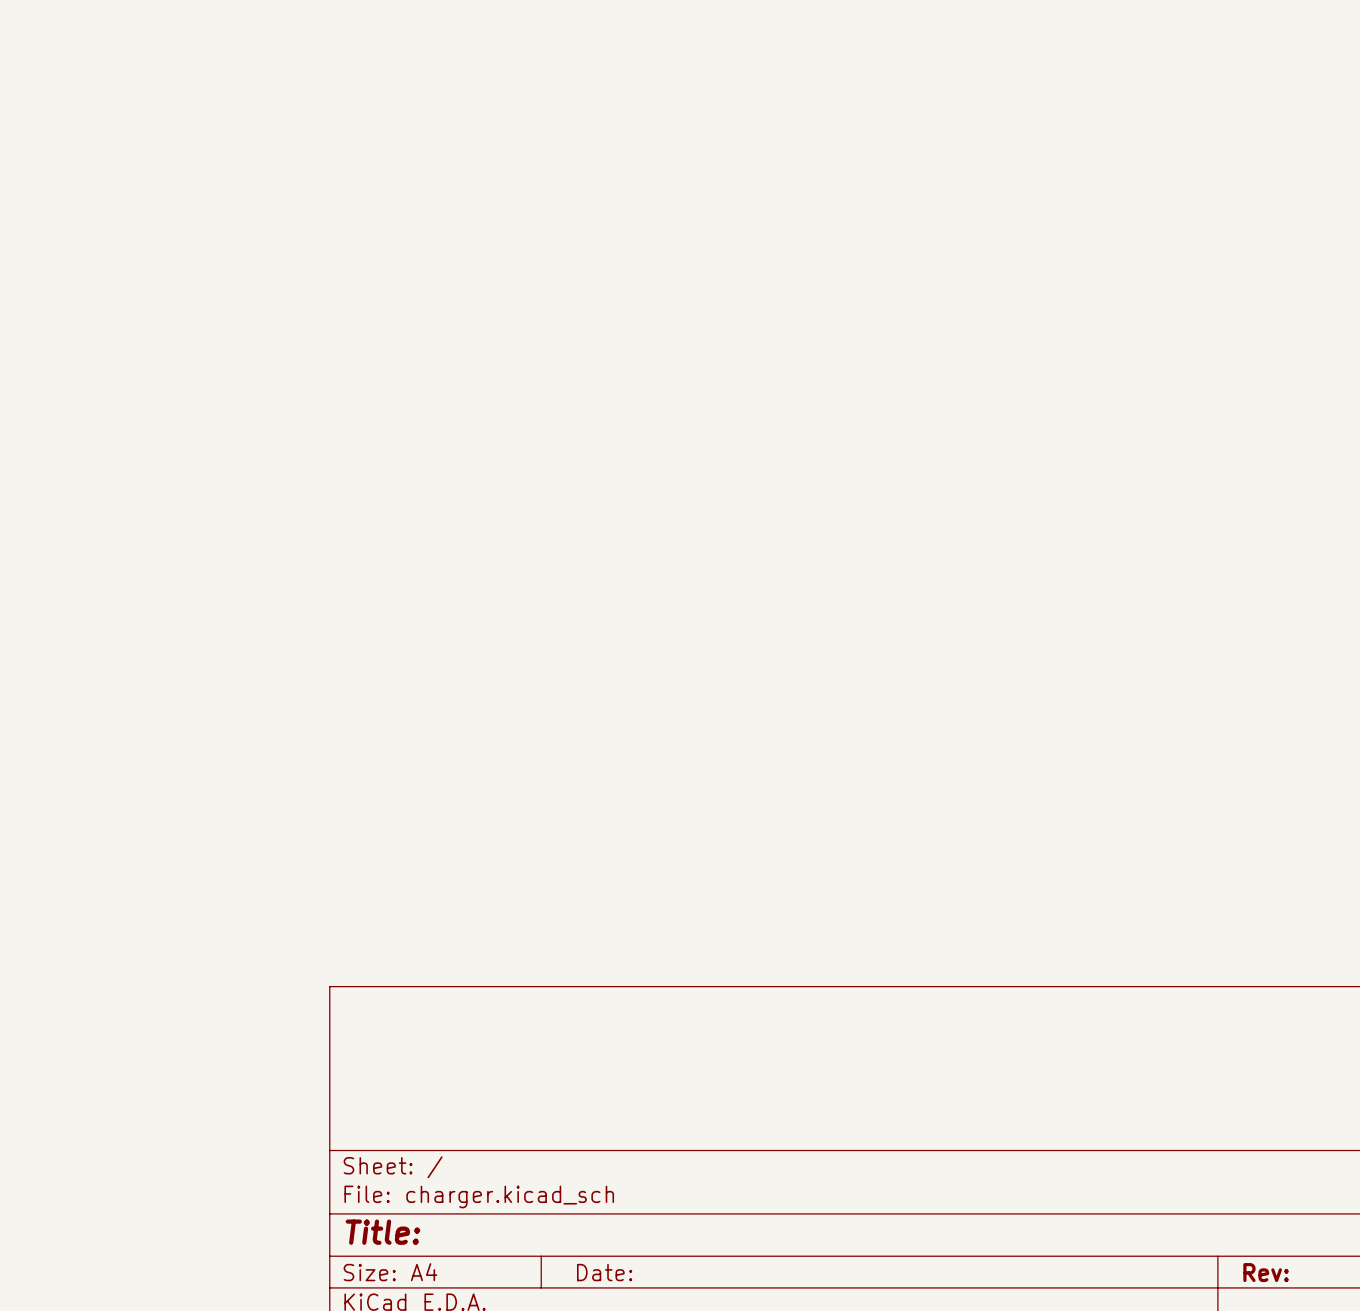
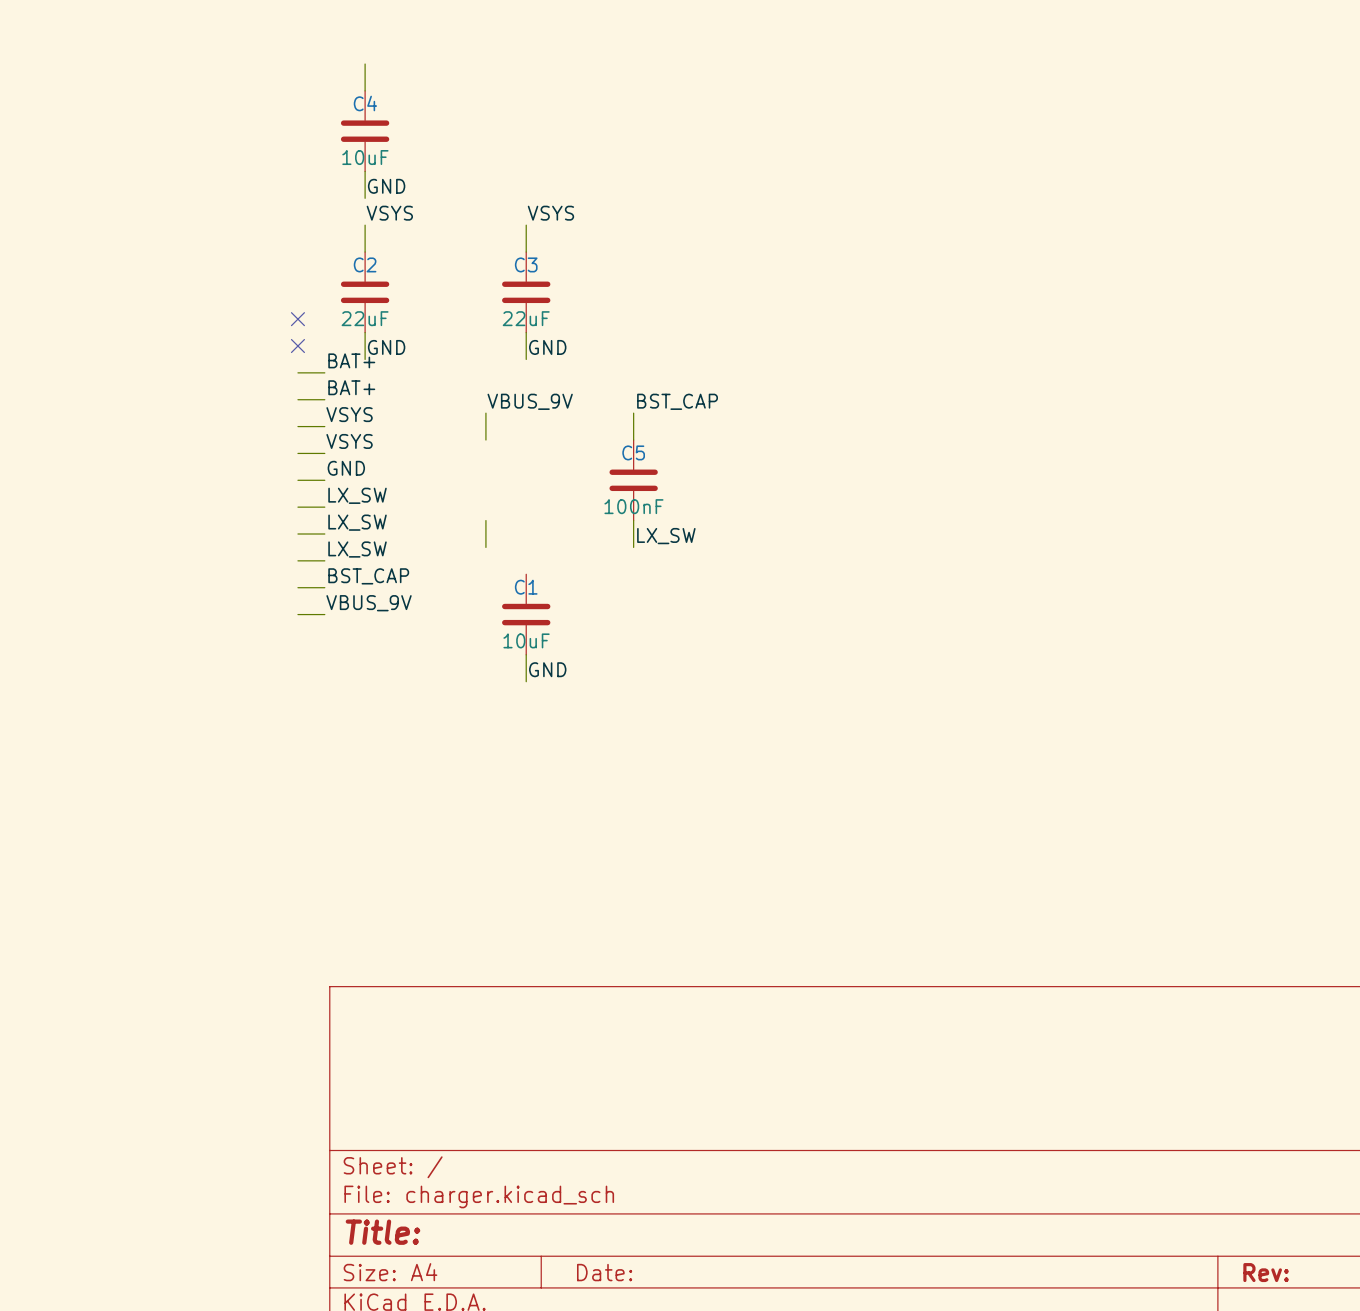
wire: none -> (365, 64) (365, 90)
C4: none -> 10uF (365, 131)
wire: none -> (365, 171) (365, 198)
label: none -> GND (386, 186)
label: none -> VSYS (389, 213)
label: none -> VSYS (550, 213)
wire: none -> (365, 225) (365, 252)
wire: none -> (526, 225) (526, 252)
C2: none -> 22uF (365, 292)
C3: none -> 22uF (526, 292)
no-connect mark: none -> (297, 319)
wire: none -> (365, 332) (365, 359)
wire: none -> (526, 332) (526, 359)
no-connect mark: none -> (297, 346)
label: none -> GND (386, 347)
label: none -> GND (547, 347)
label: none -> BAT+ (351, 360)
wire: none -> (297, 372) (324, 372)
label: none -> BAT+ (351, 387)
wire: none -> (297, 399) (324, 399)
label: none -> VBUS_9V (530, 401)
label: none -> BST_CAP (677, 401)
wire: none -> (485, 413) (485, 440)
wire: none -> (633, 413) (633, 440)
label: none -> VSYS (349, 414)
wire: none -> (297, 426) (324, 426)
label: none -> VSYS (349, 441)
wire: none -> (297, 453) (324, 453)
label: none -> GND (346, 468)
wire: none -> (297, 480) (324, 480)
C5: none -> 100nF (633, 480)
label: none -> LX_SW (357, 495)
wire: none -> (297, 507) (324, 507)
wire: none -> (485, 520) (485, 547)
wire: none -> (633, 520) (633, 547)
label: none -> LX_SW (357, 522)
wire: none -> (297, 534) (324, 534)
label: none -> LX_SW (666, 536)
label: none -> LX_SW (357, 549)
wire: none -> (297, 560) (324, 560)
label: none -> BST_CAP (368, 576)
wire: none -> (297, 587) (324, 587)
label: none -> VBUS_9V (369, 603)
wire: none -> (297, 614) (324, 614)
C1: none -> 10uF (526, 614)
wire: none -> (526, 654) (526, 681)
label: none -> GND (547, 669)

